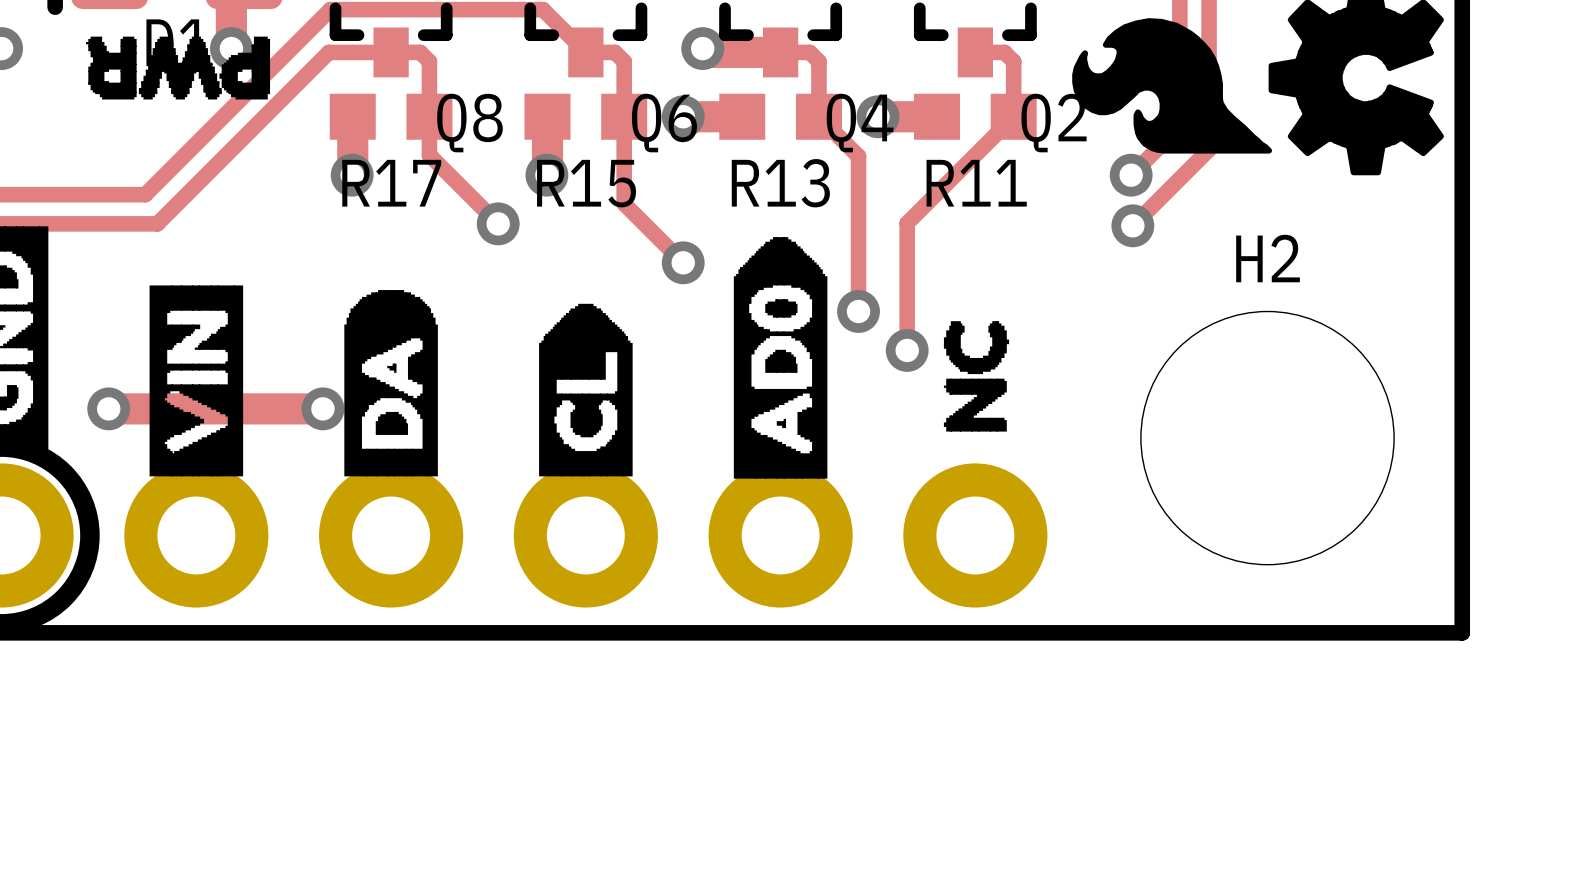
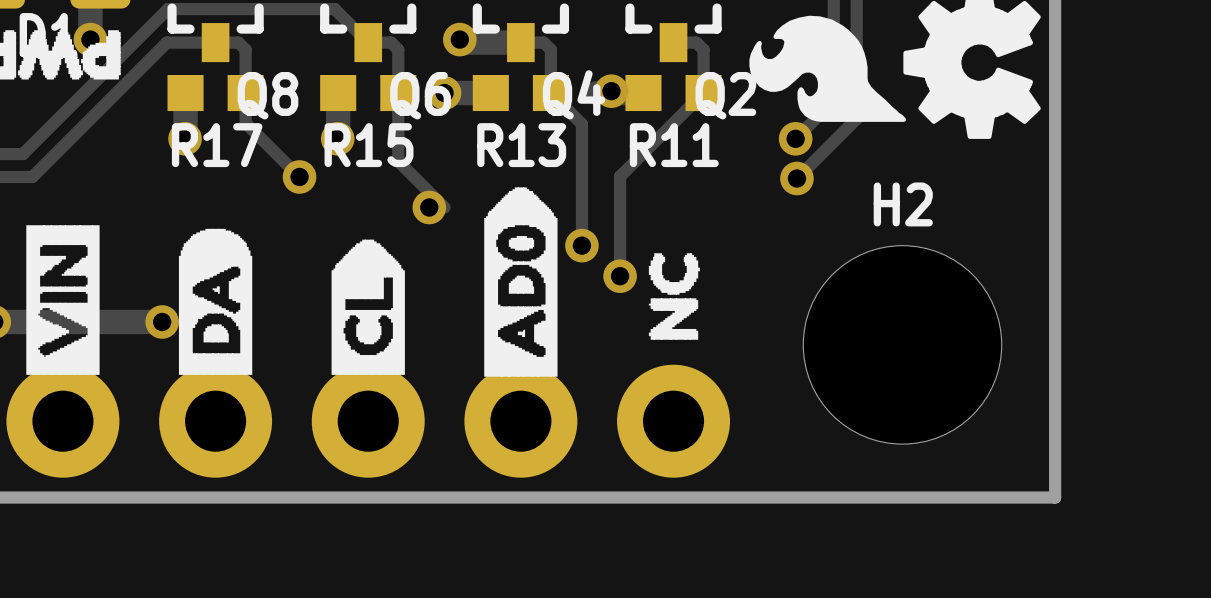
via position: (877, 116) -> (611, 91)
via position: (683, 262) -> (429, 207)

